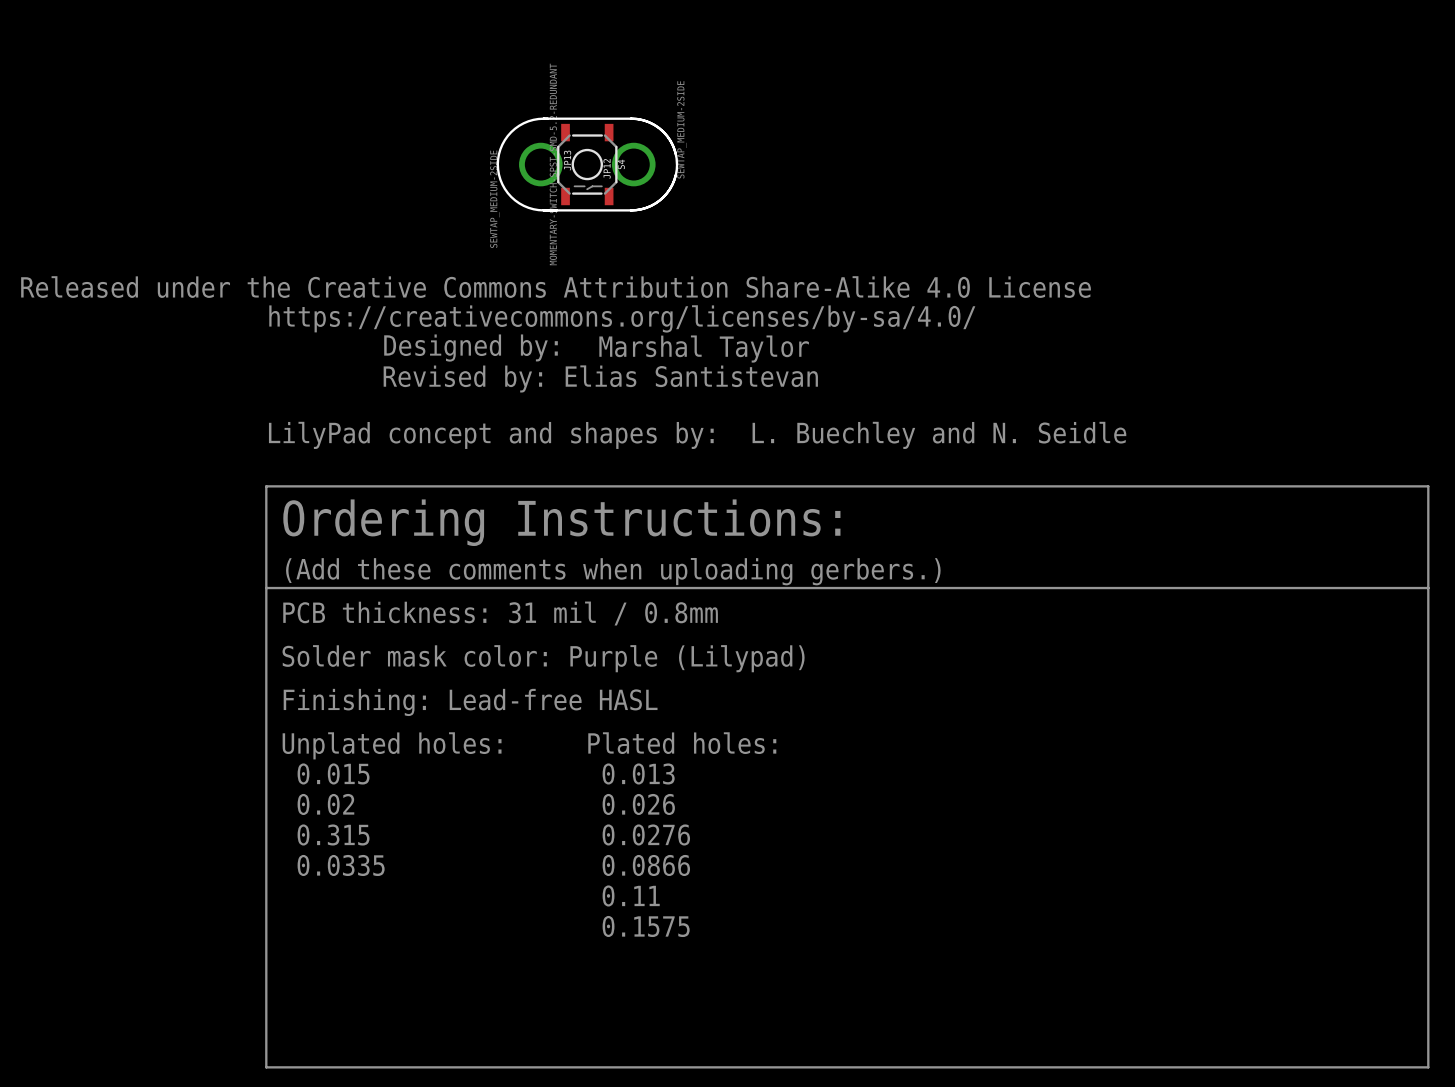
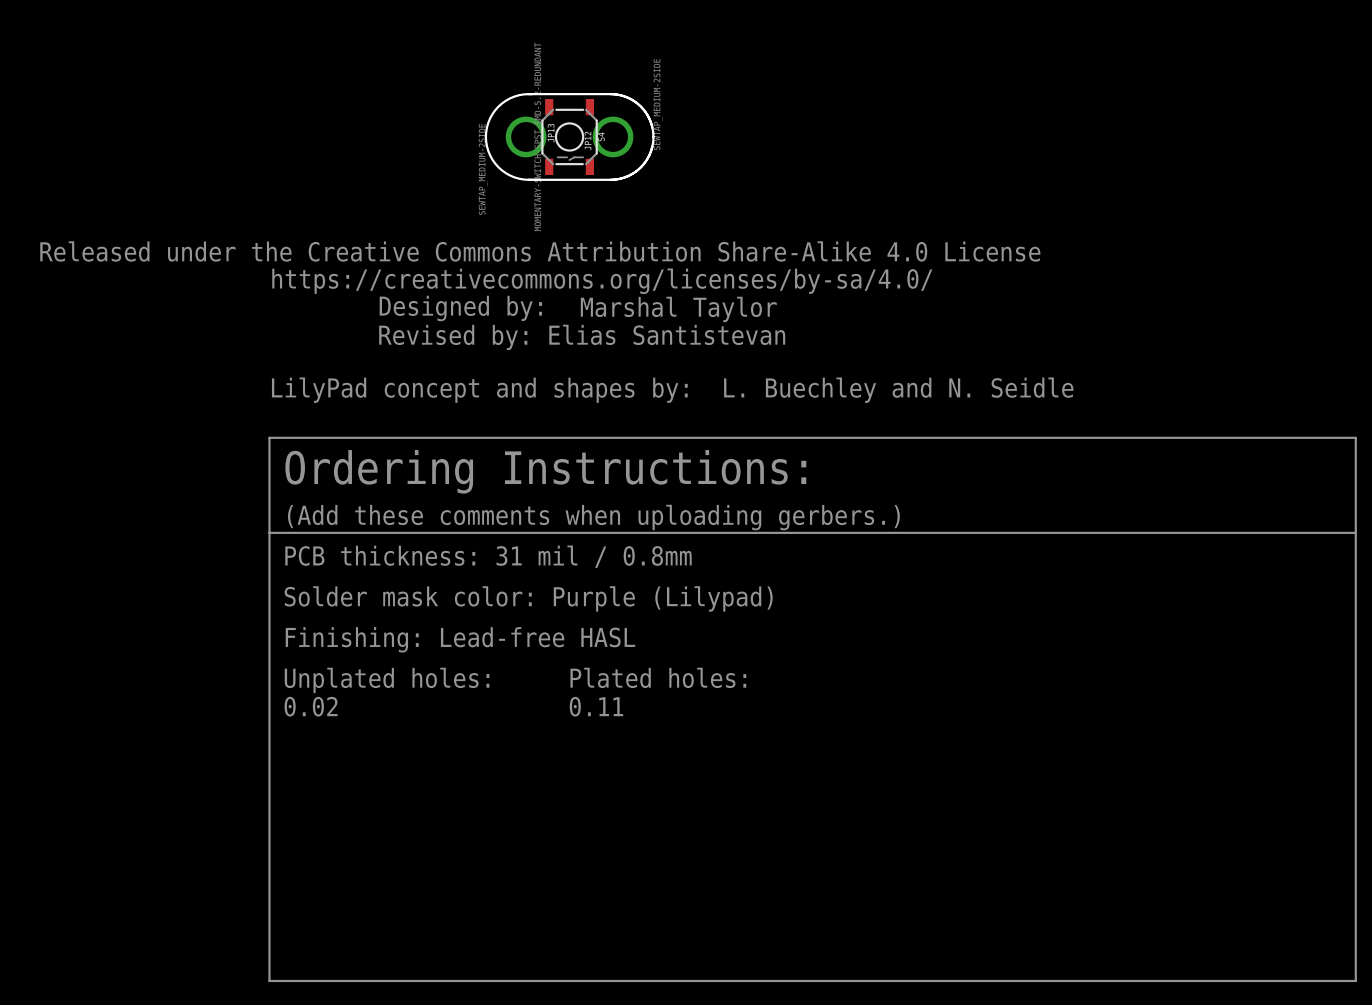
text: 0.015 (333, 773) -> 0.02 (311, 706)
text: 0.013 (638, 773) -> 0.11 (596, 706)
text: 0.02 (325, 804) -> none
text: 0.026 (638, 804) -> none
text: 0.315 (333, 834) -> none
text: 0.0276 (646, 834) -> none
text: 0.0335 (341, 865) -> none
text: 0.0866 (646, 865) -> none
text: 0.11 (631, 895) -> none
text: 0.1575 (646, 926) -> none

